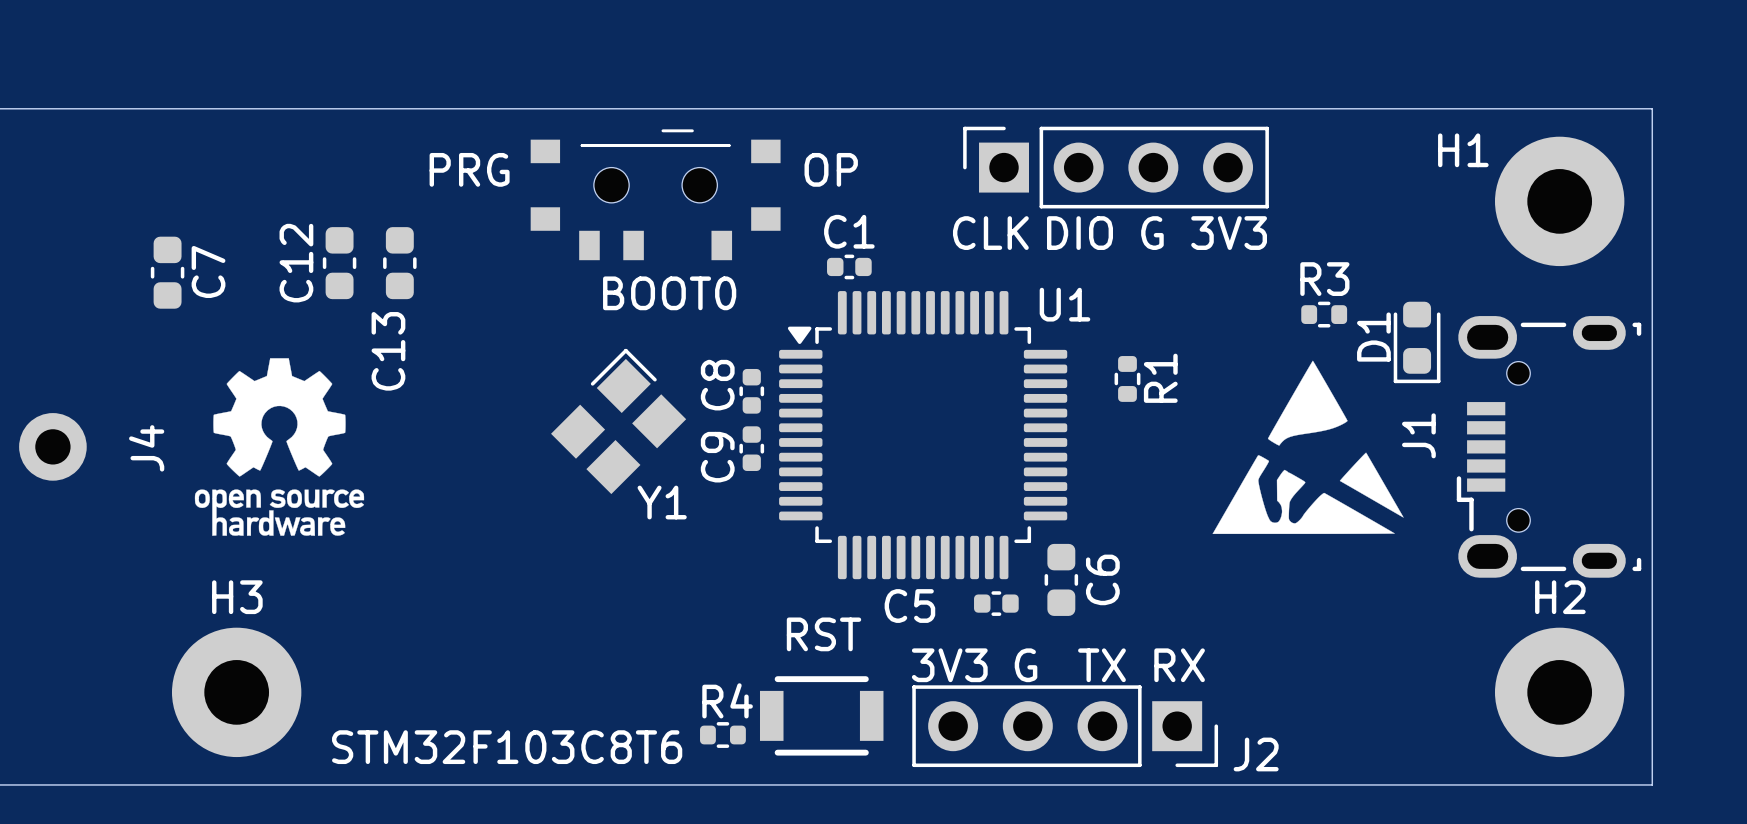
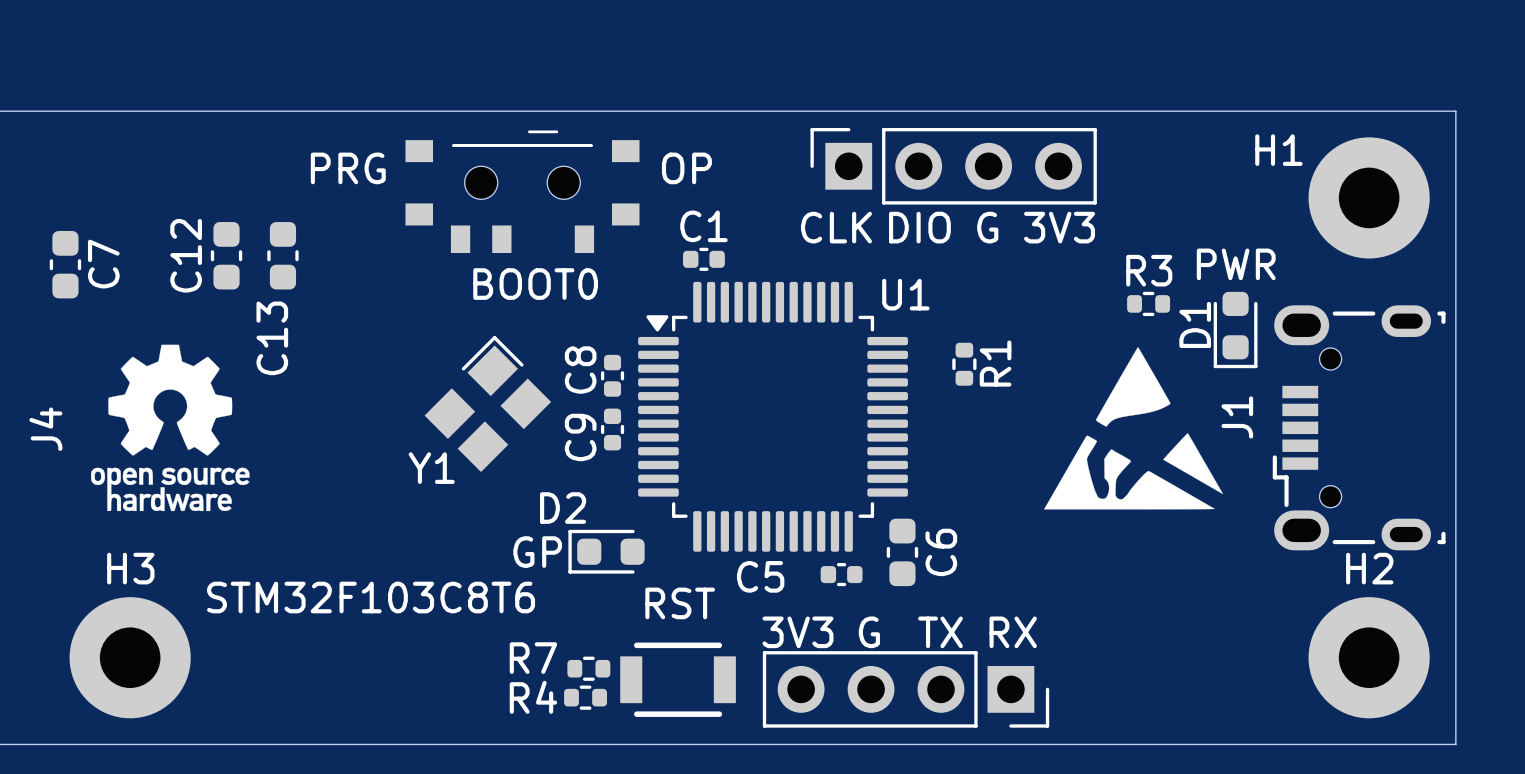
D1 value: none -> PWR (1236, 264)
Y1 name position: Y1 (662, 502) -> Y1 (431, 468)
D2: none -> GP (606, 551)
R4 name position: R4 (727, 700) -> R4 (533, 697)
R7: none -> (588, 668)
U1 value position: STM32F103C8T6 (507, 747) -> STM32F103C8T6 (371, 597)
J2 name: J2 (1256, 754) -> none

